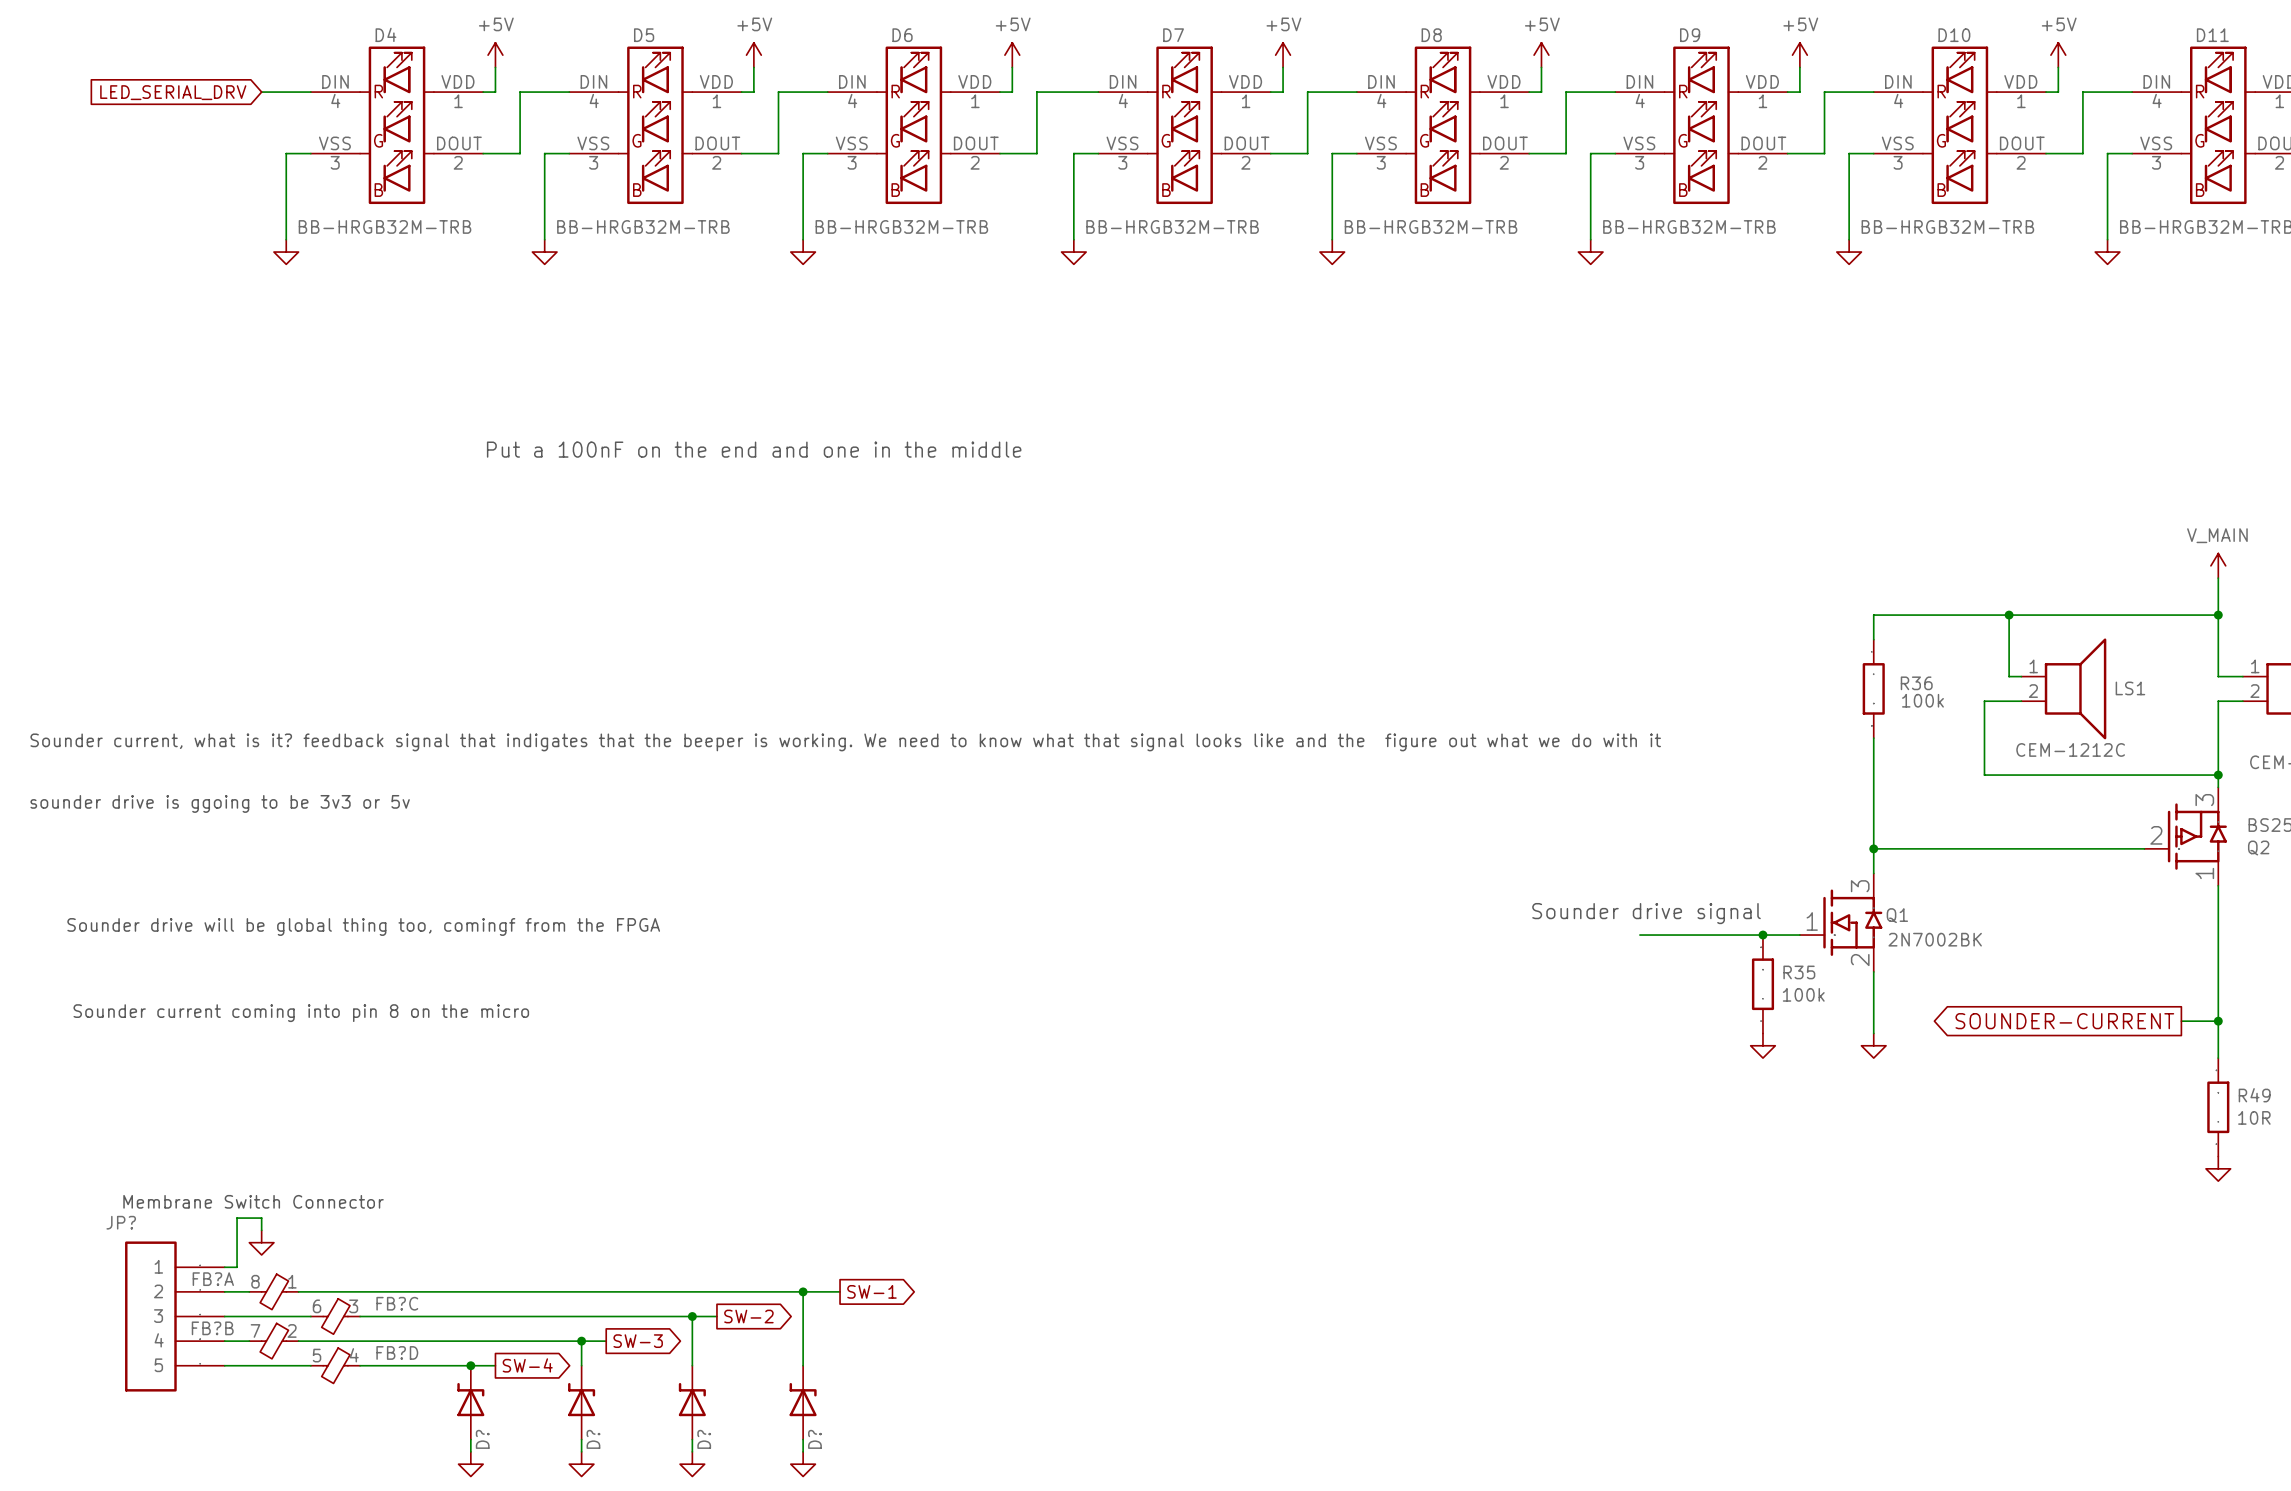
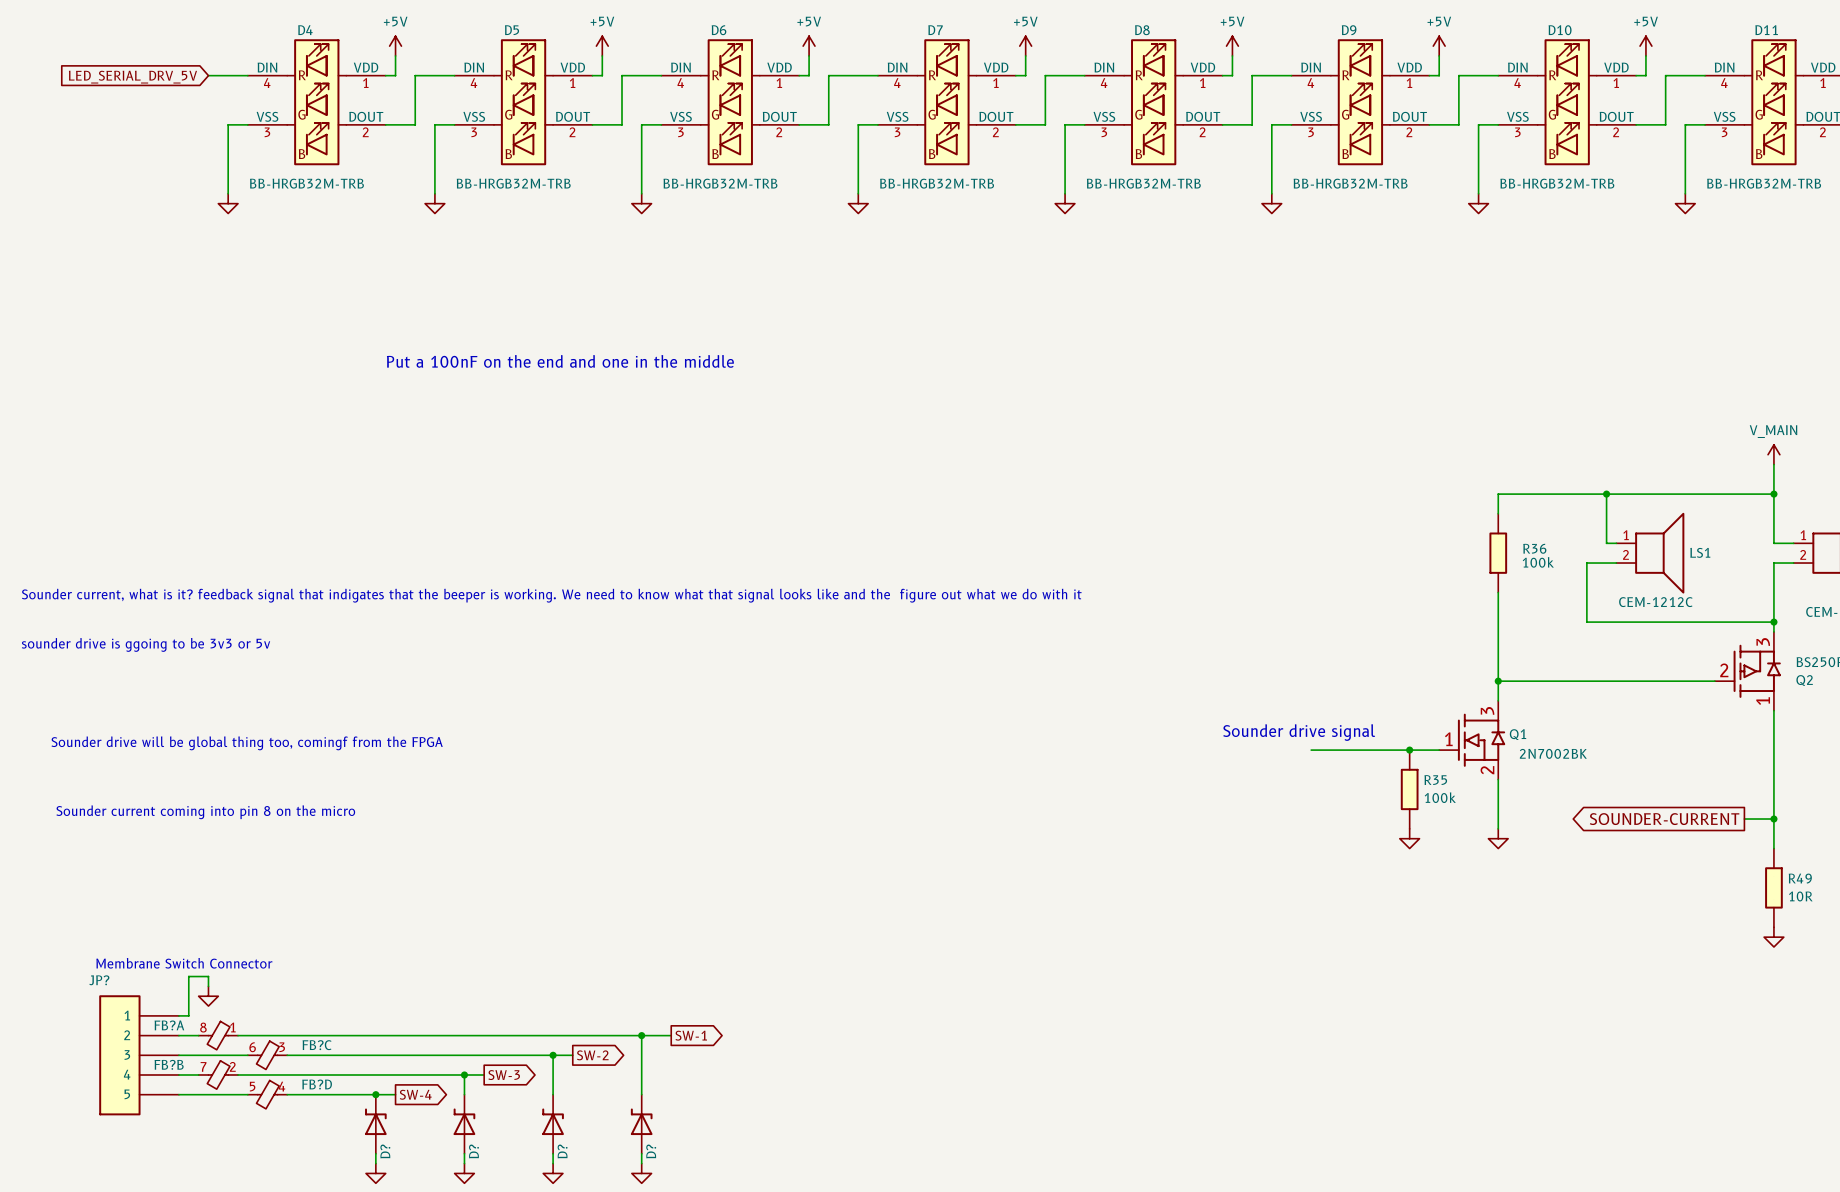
global label: LED_SERIAL_DRV (173, 92) -> LED_SERIAL_DRV_5V (132, 77)

